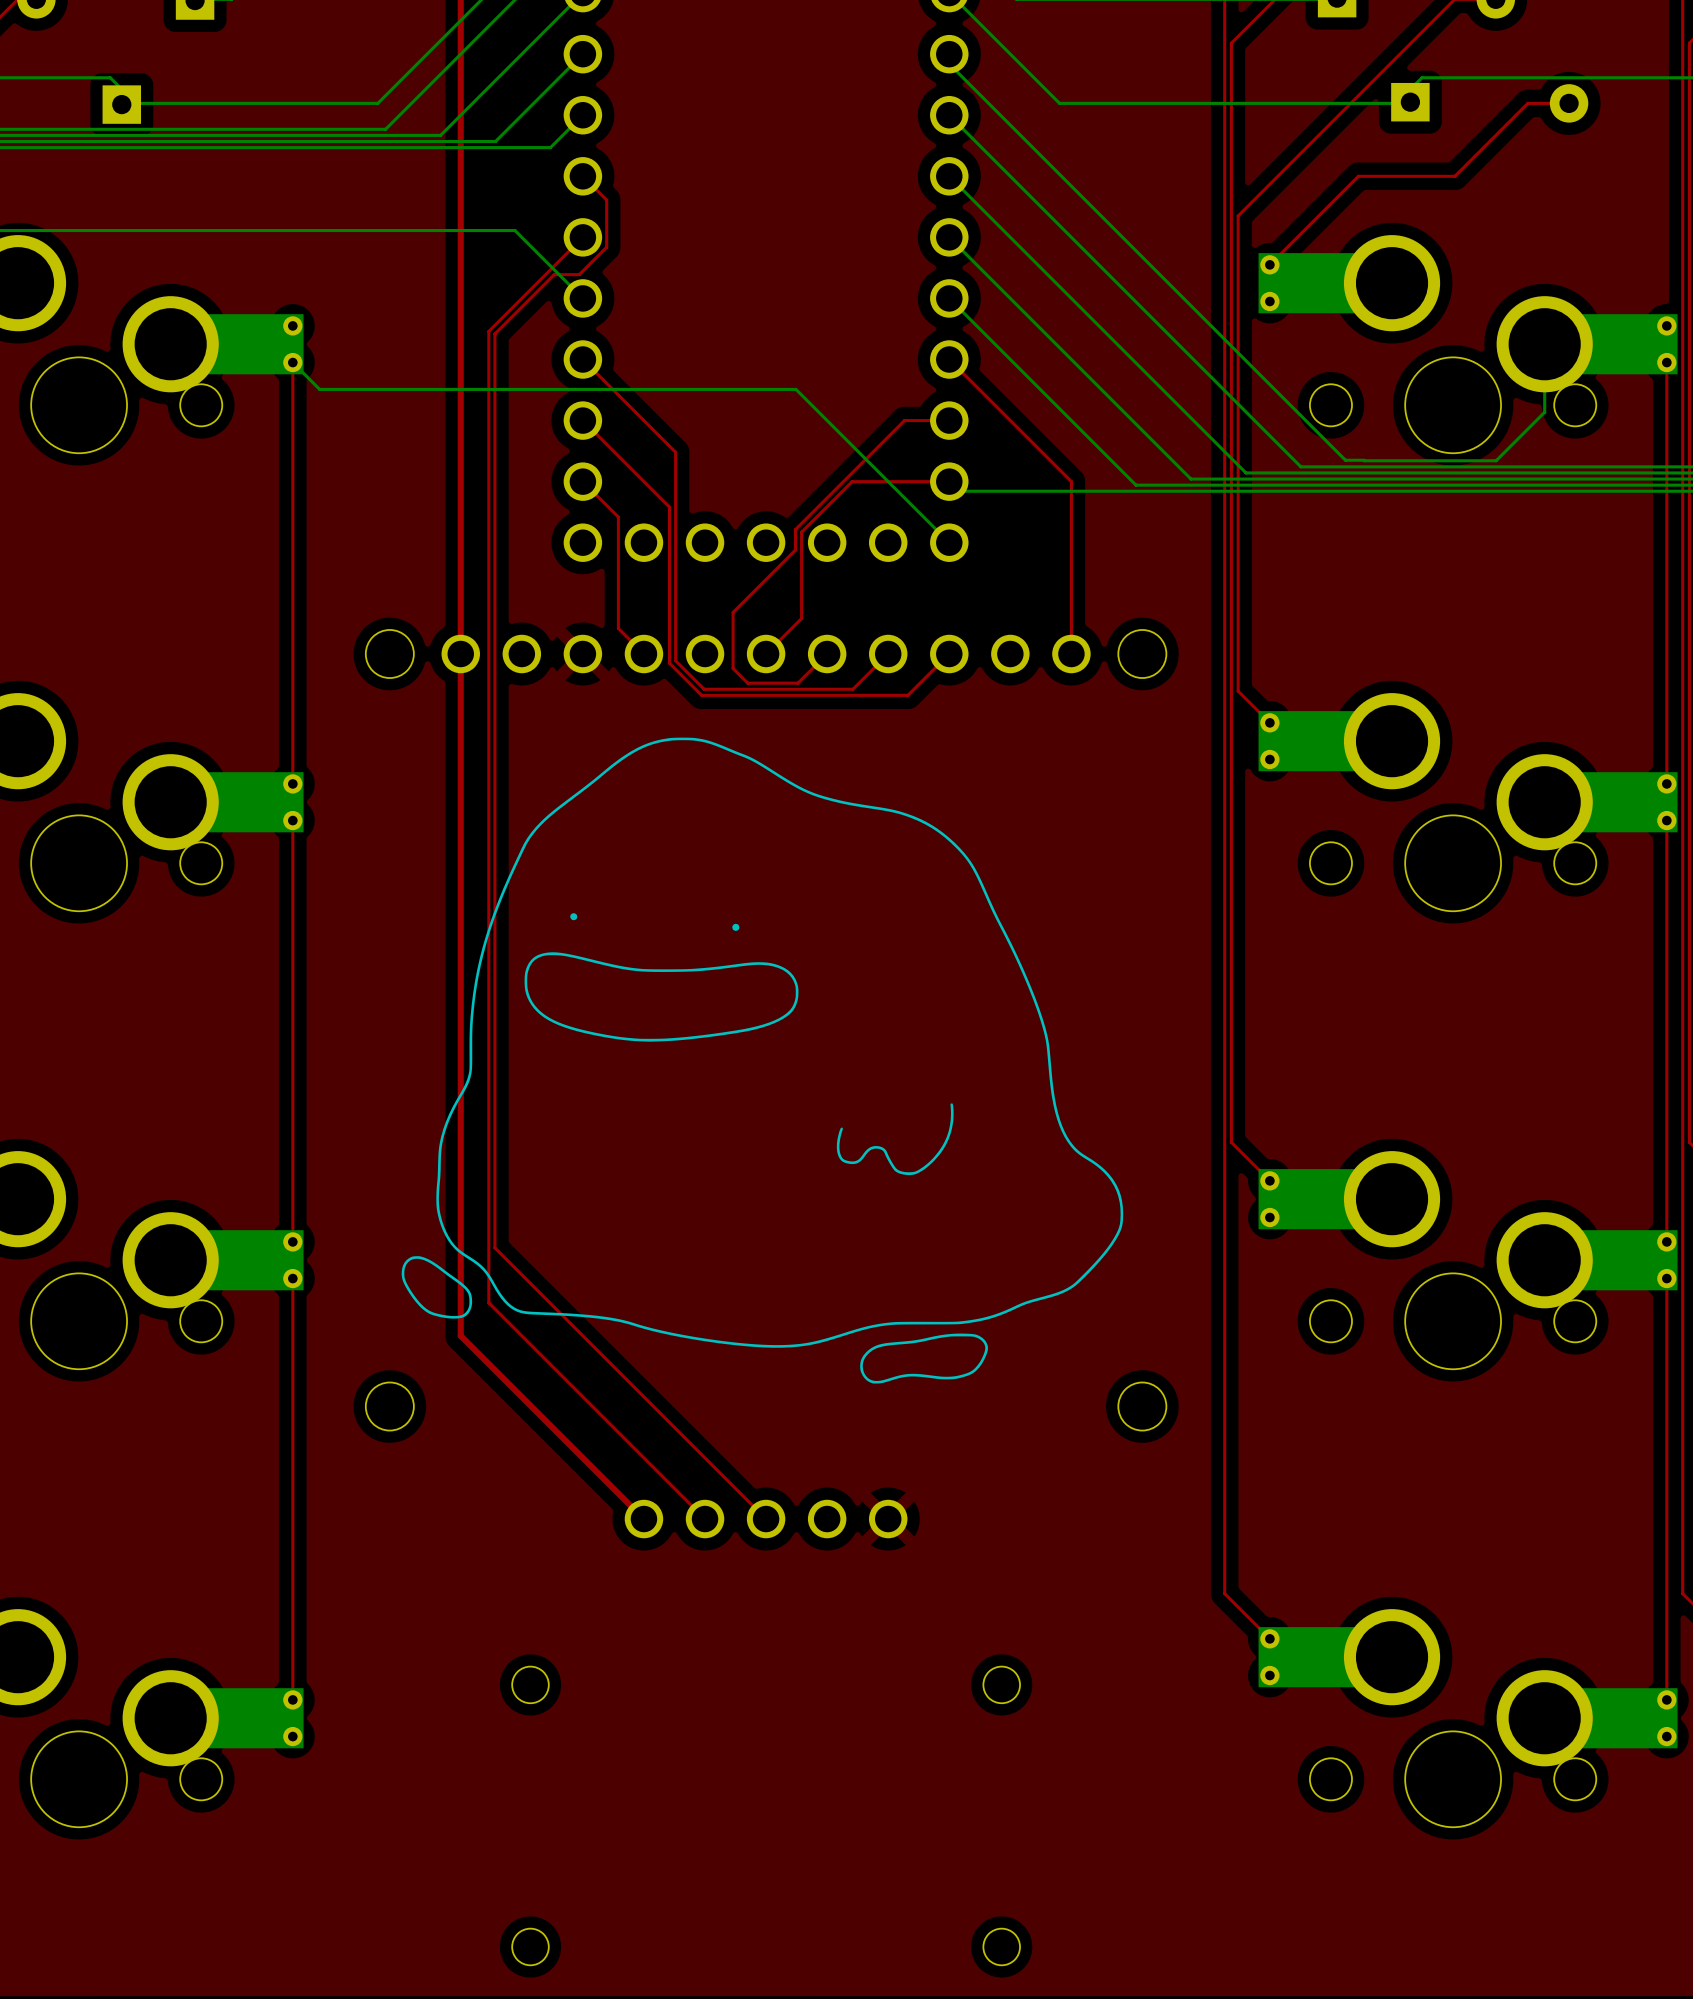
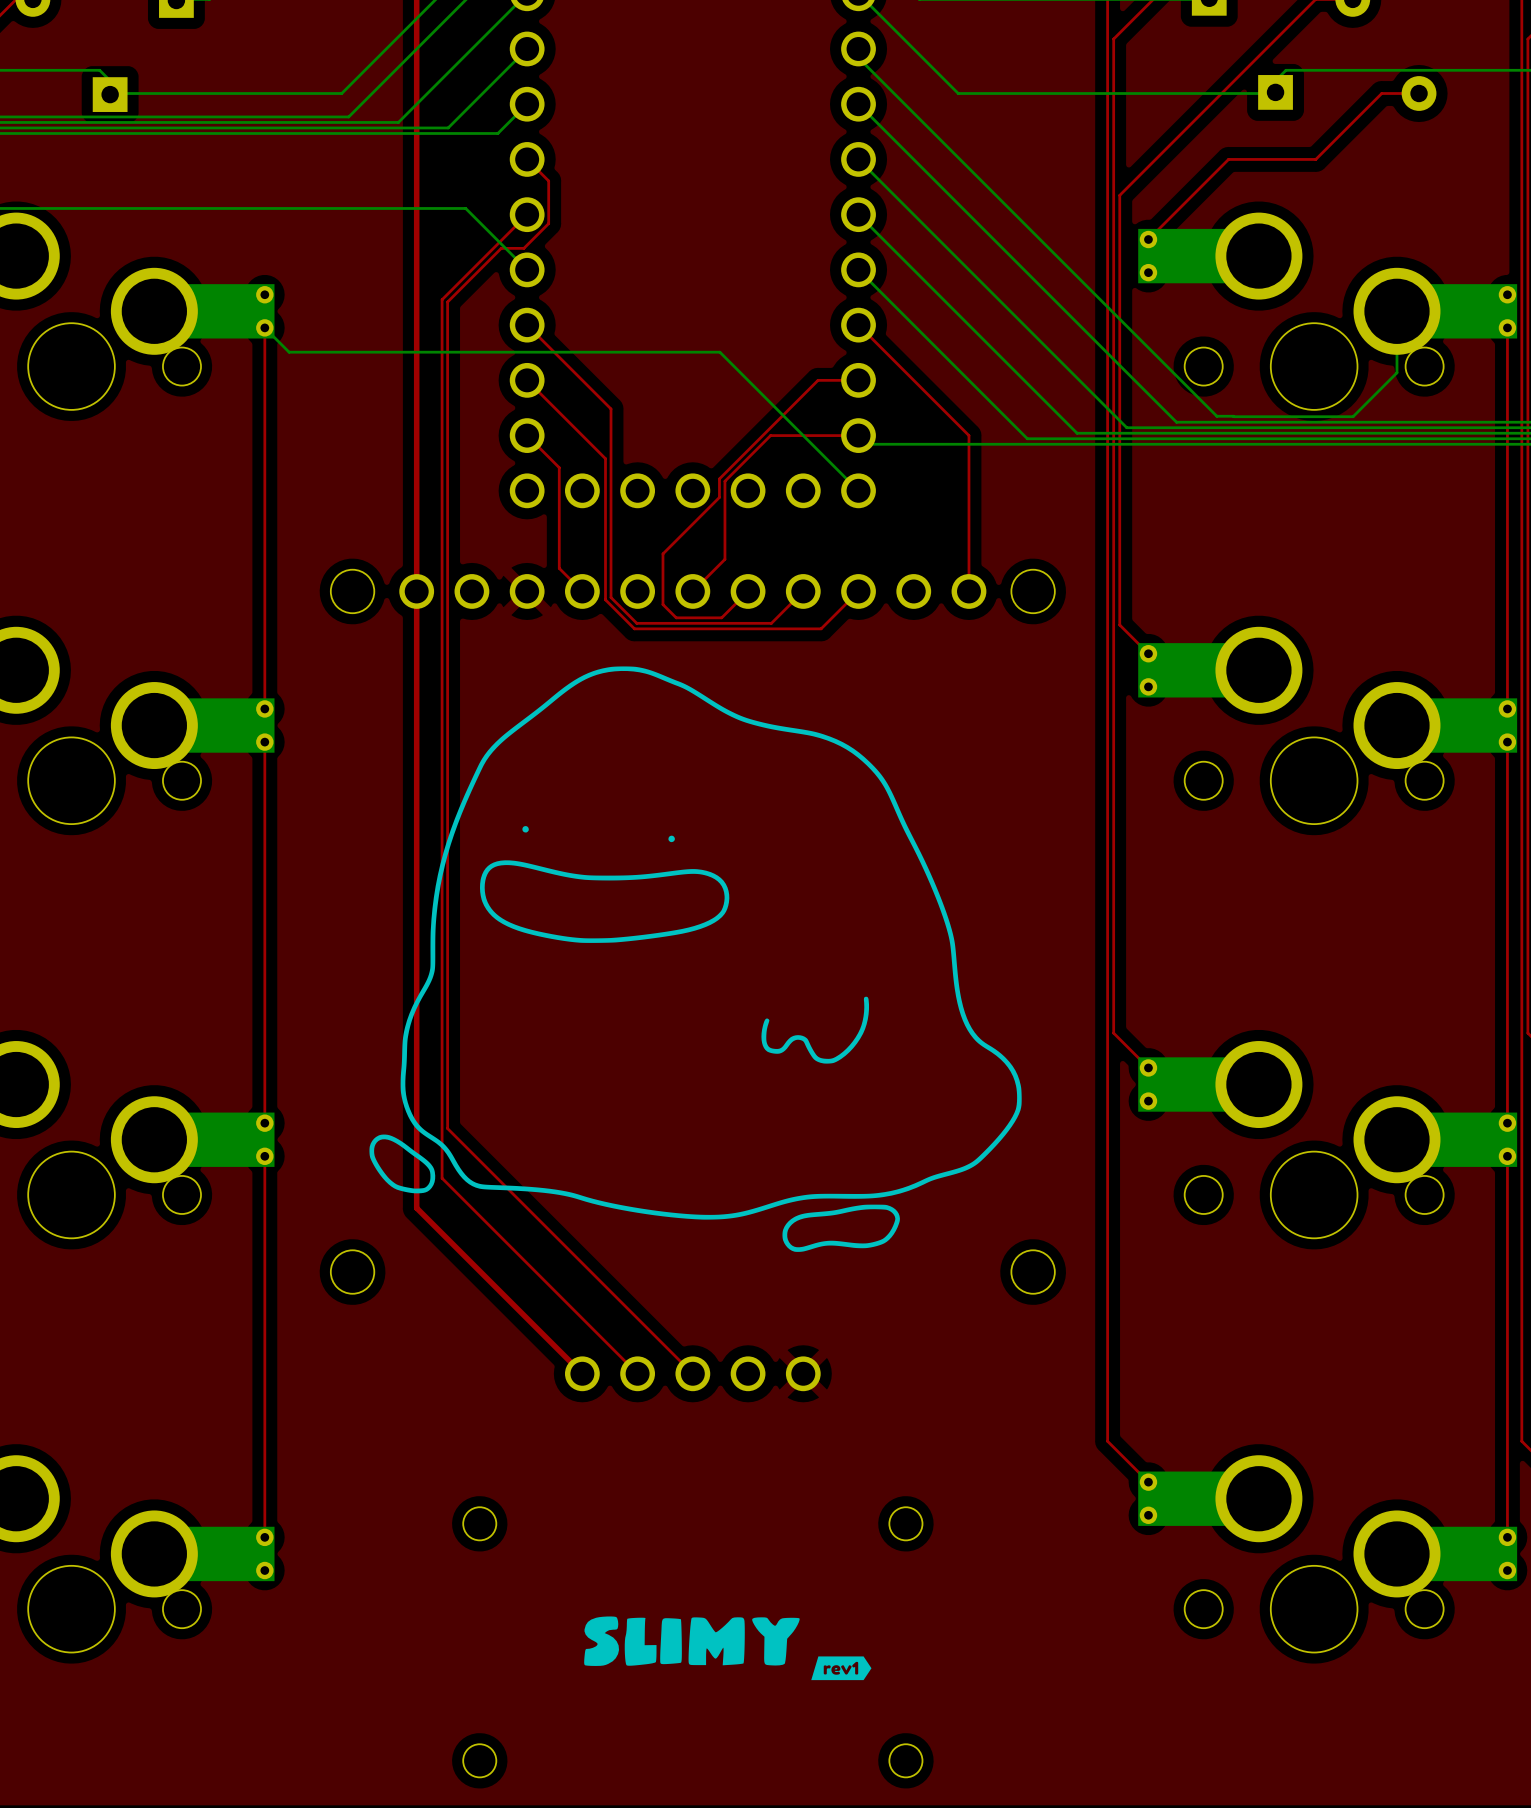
drawing shape: [401, 737, 1124, 1384] -> [369, 666, 1022, 1252]
drawing: none -> [584, 1616, 872, 1681]

